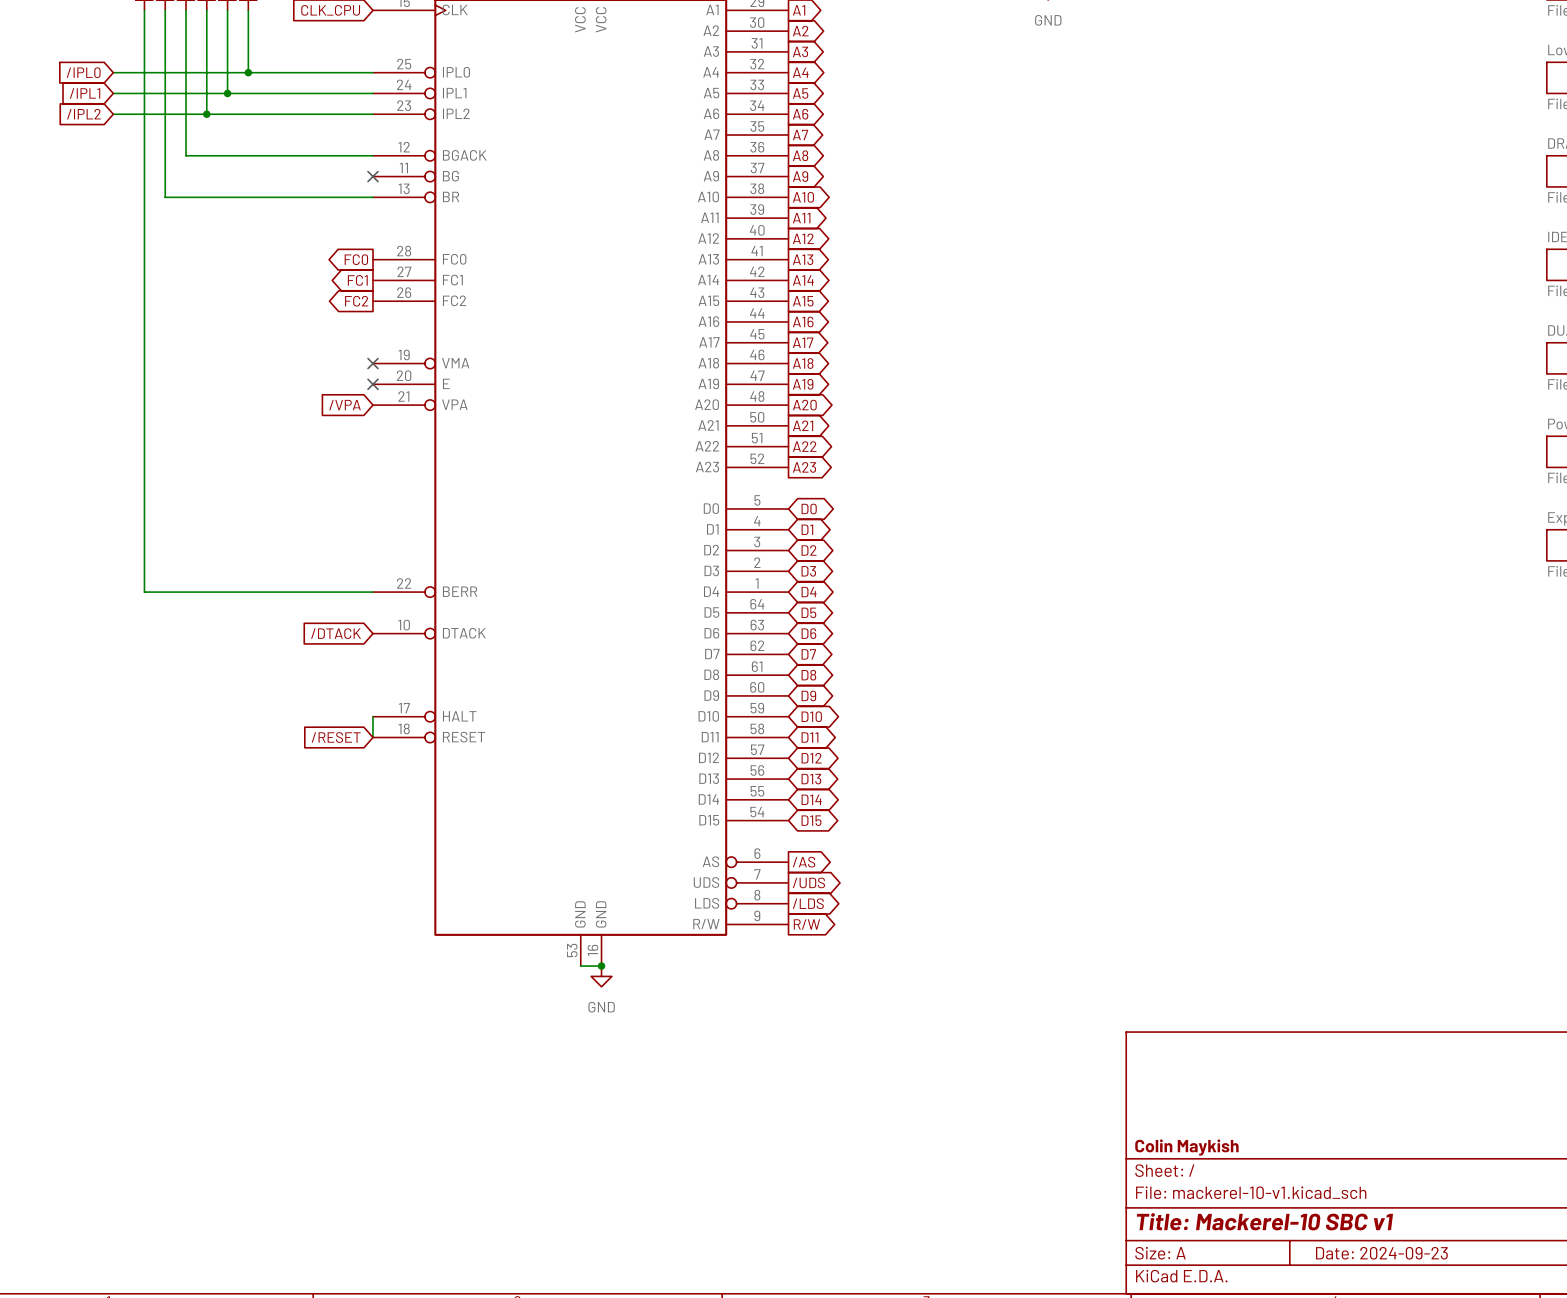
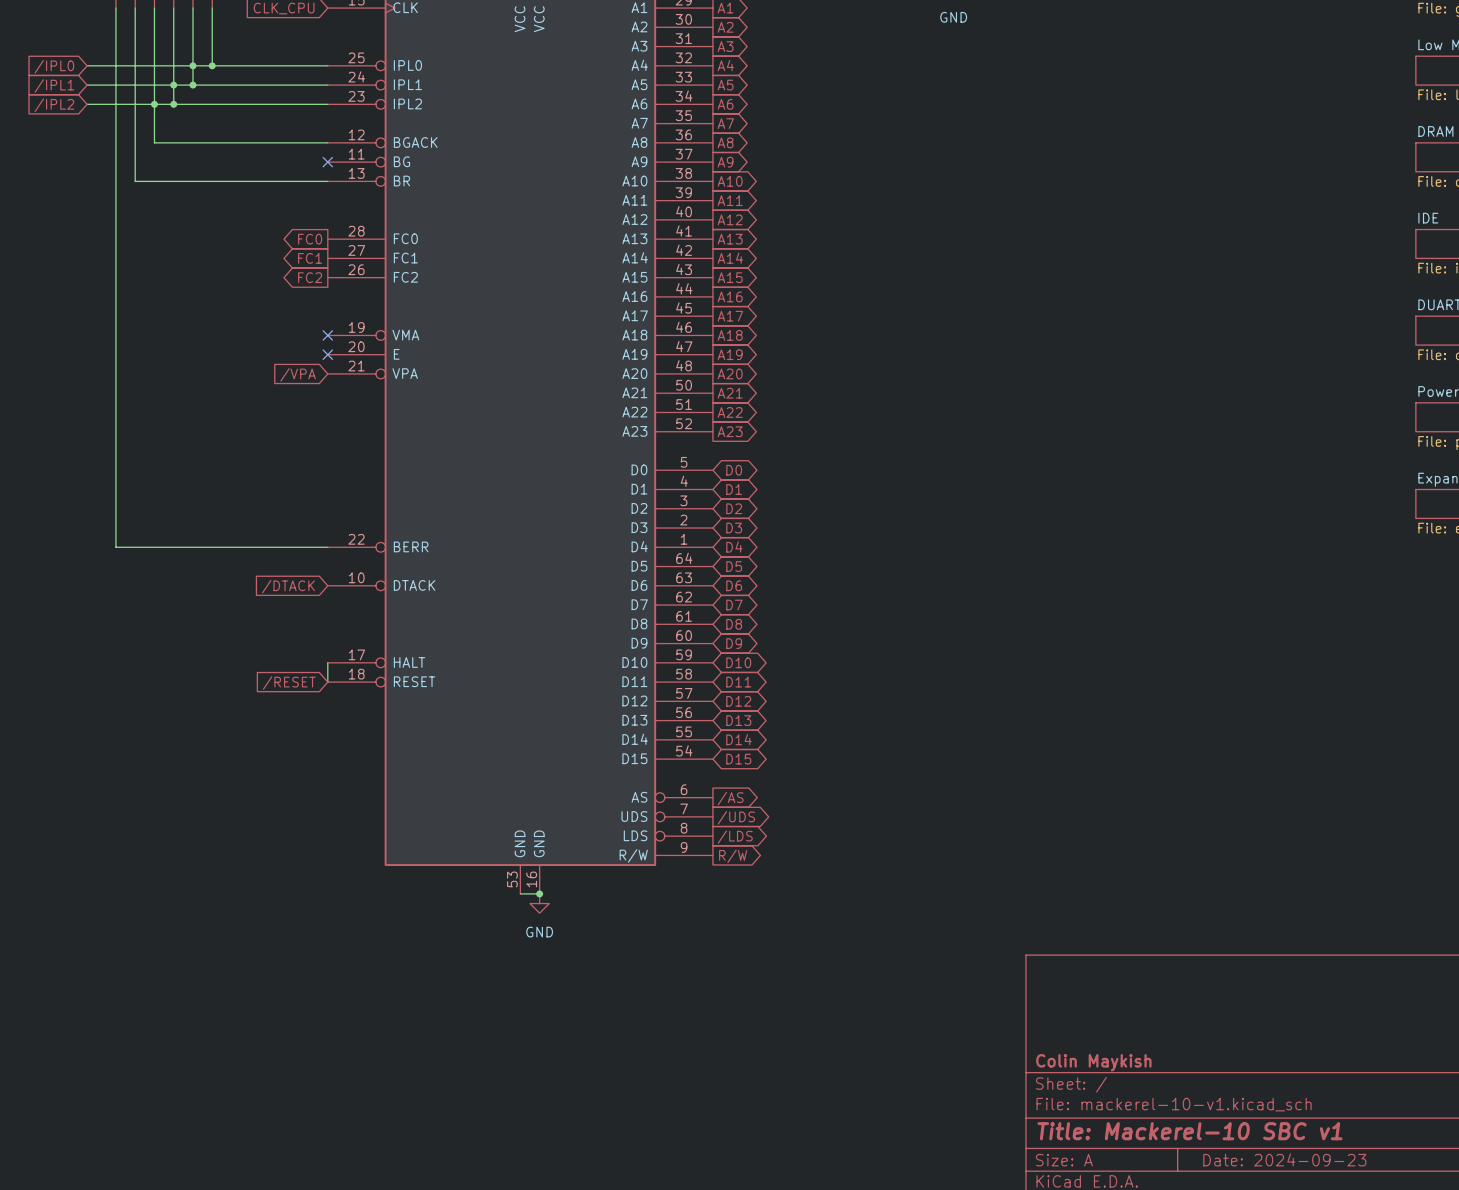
junction: none -> (192, 65)
junction: none -> (173, 85)
junction: none -> (154, 104)

